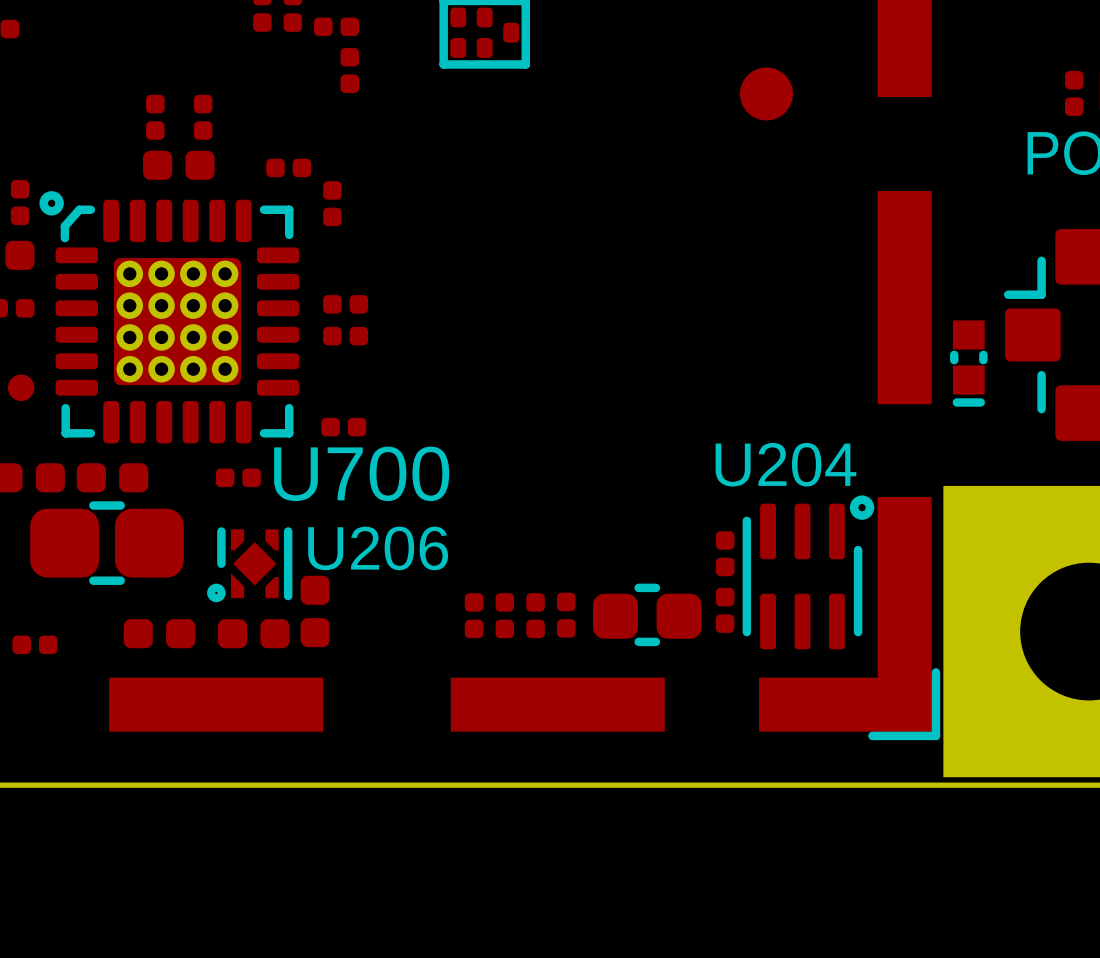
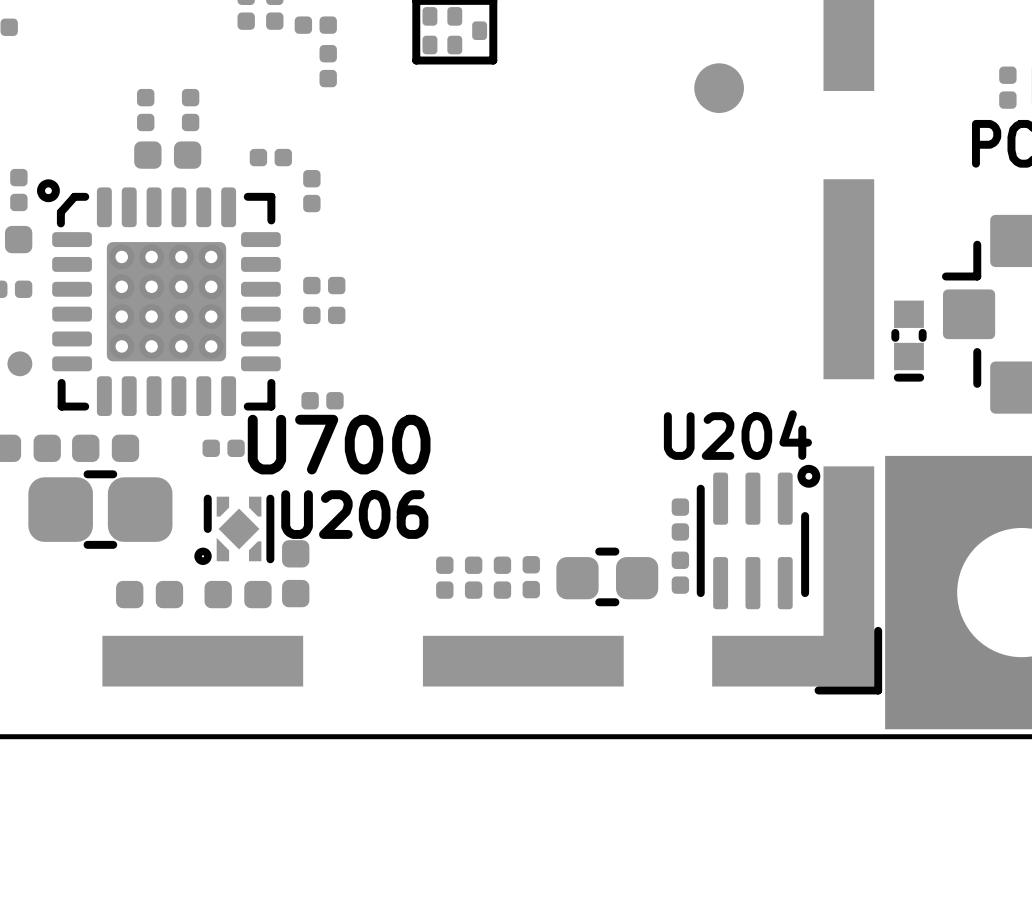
part: (34, 644) -> none

